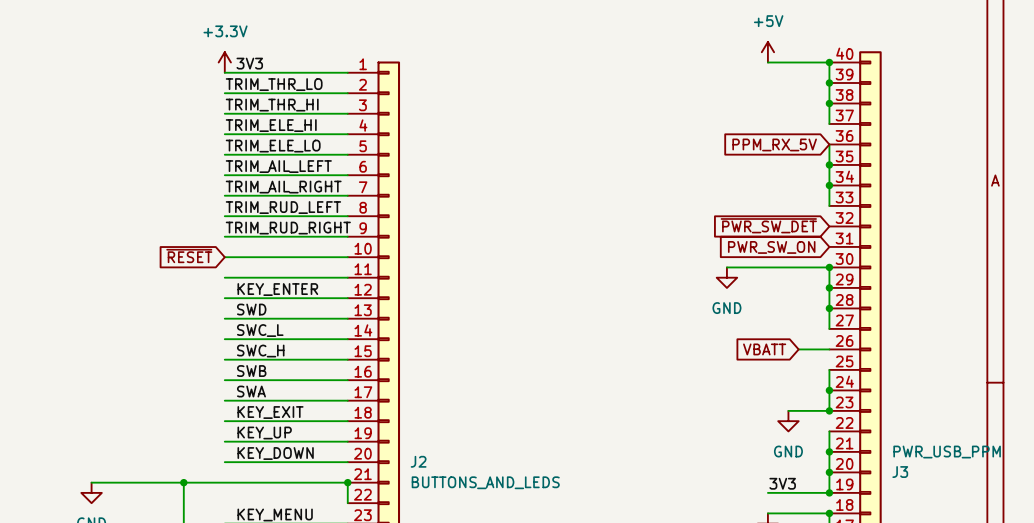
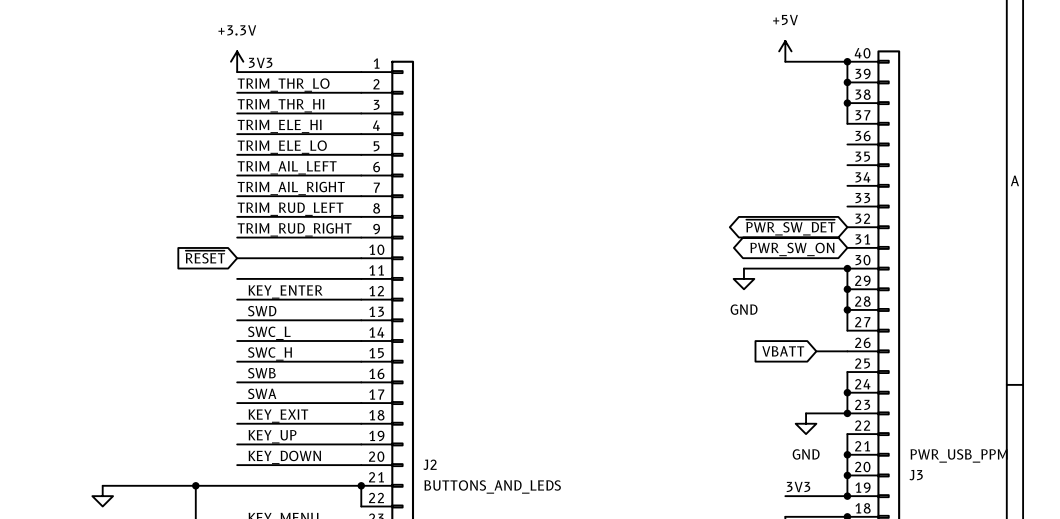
global label: PPM_RX_5V (774, 144) -> none
wire: (829, 144) (829, 205) -> none
junction: (829, 164) -> none
junction: (829, 185) -> none
global label shape: input (768, 225) -> bidirectional (790, 227)
global label shape: input (771, 247) -> bidirectional (792, 249)

